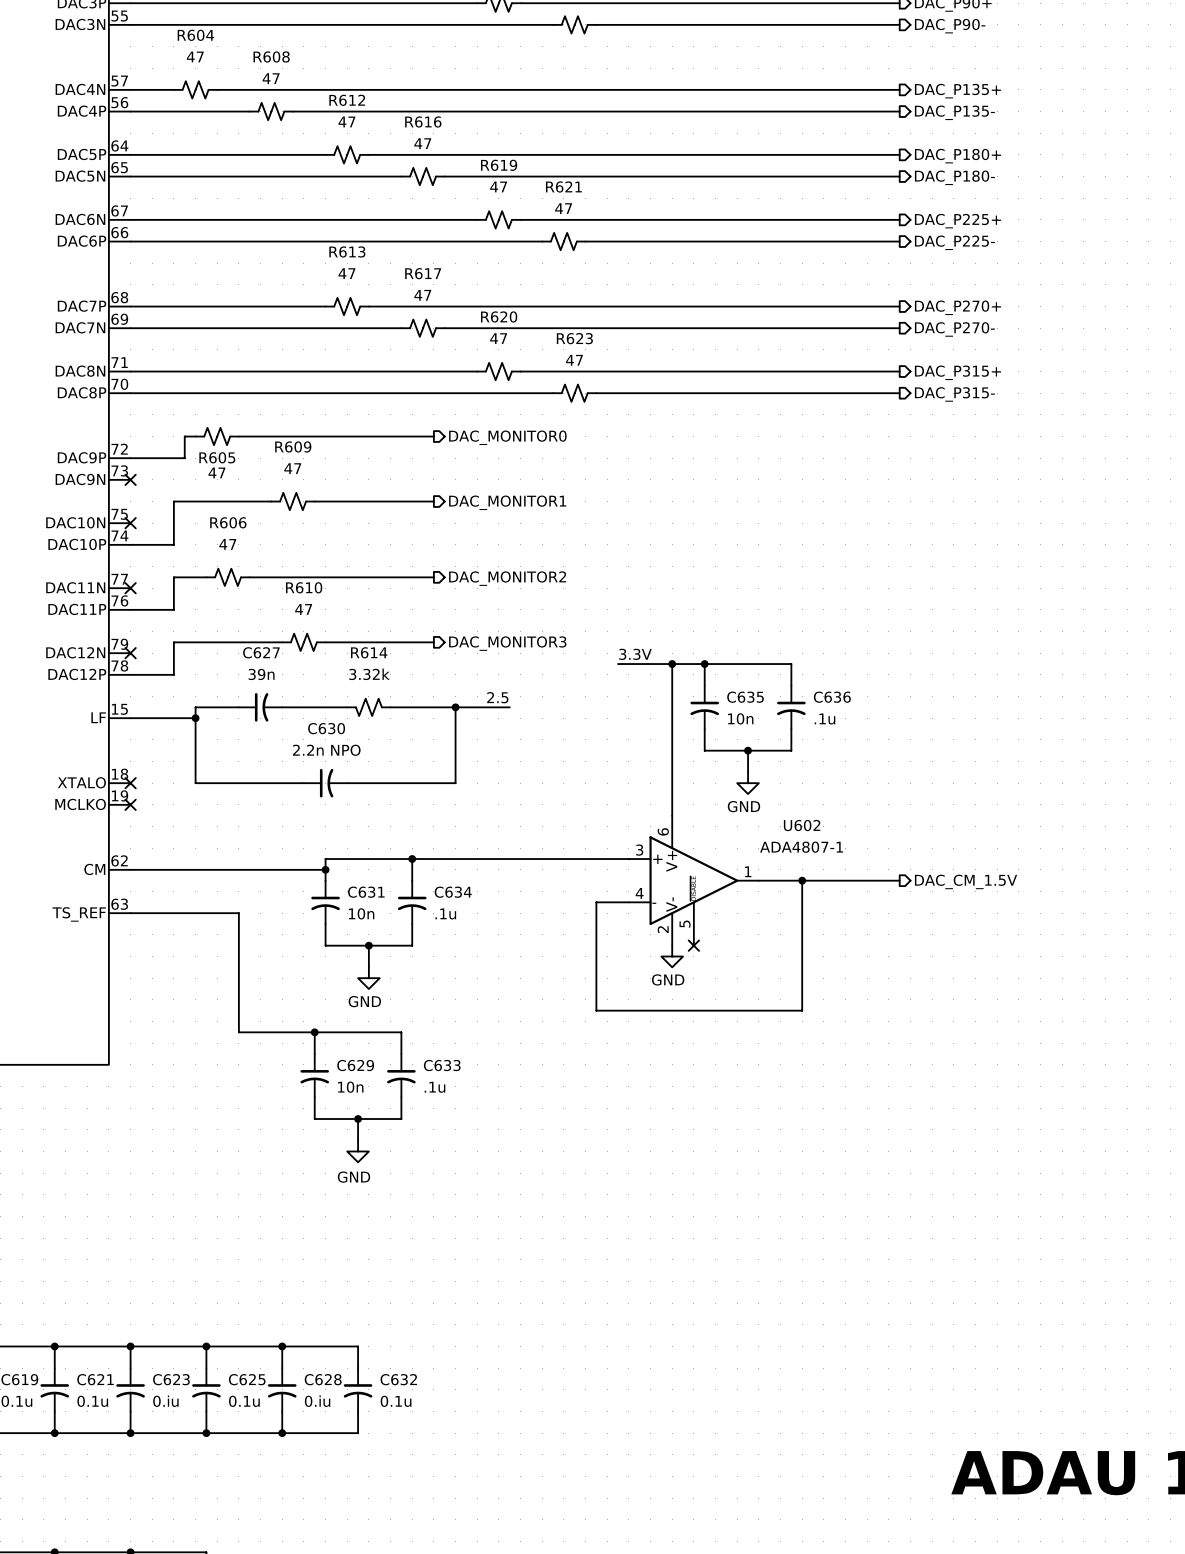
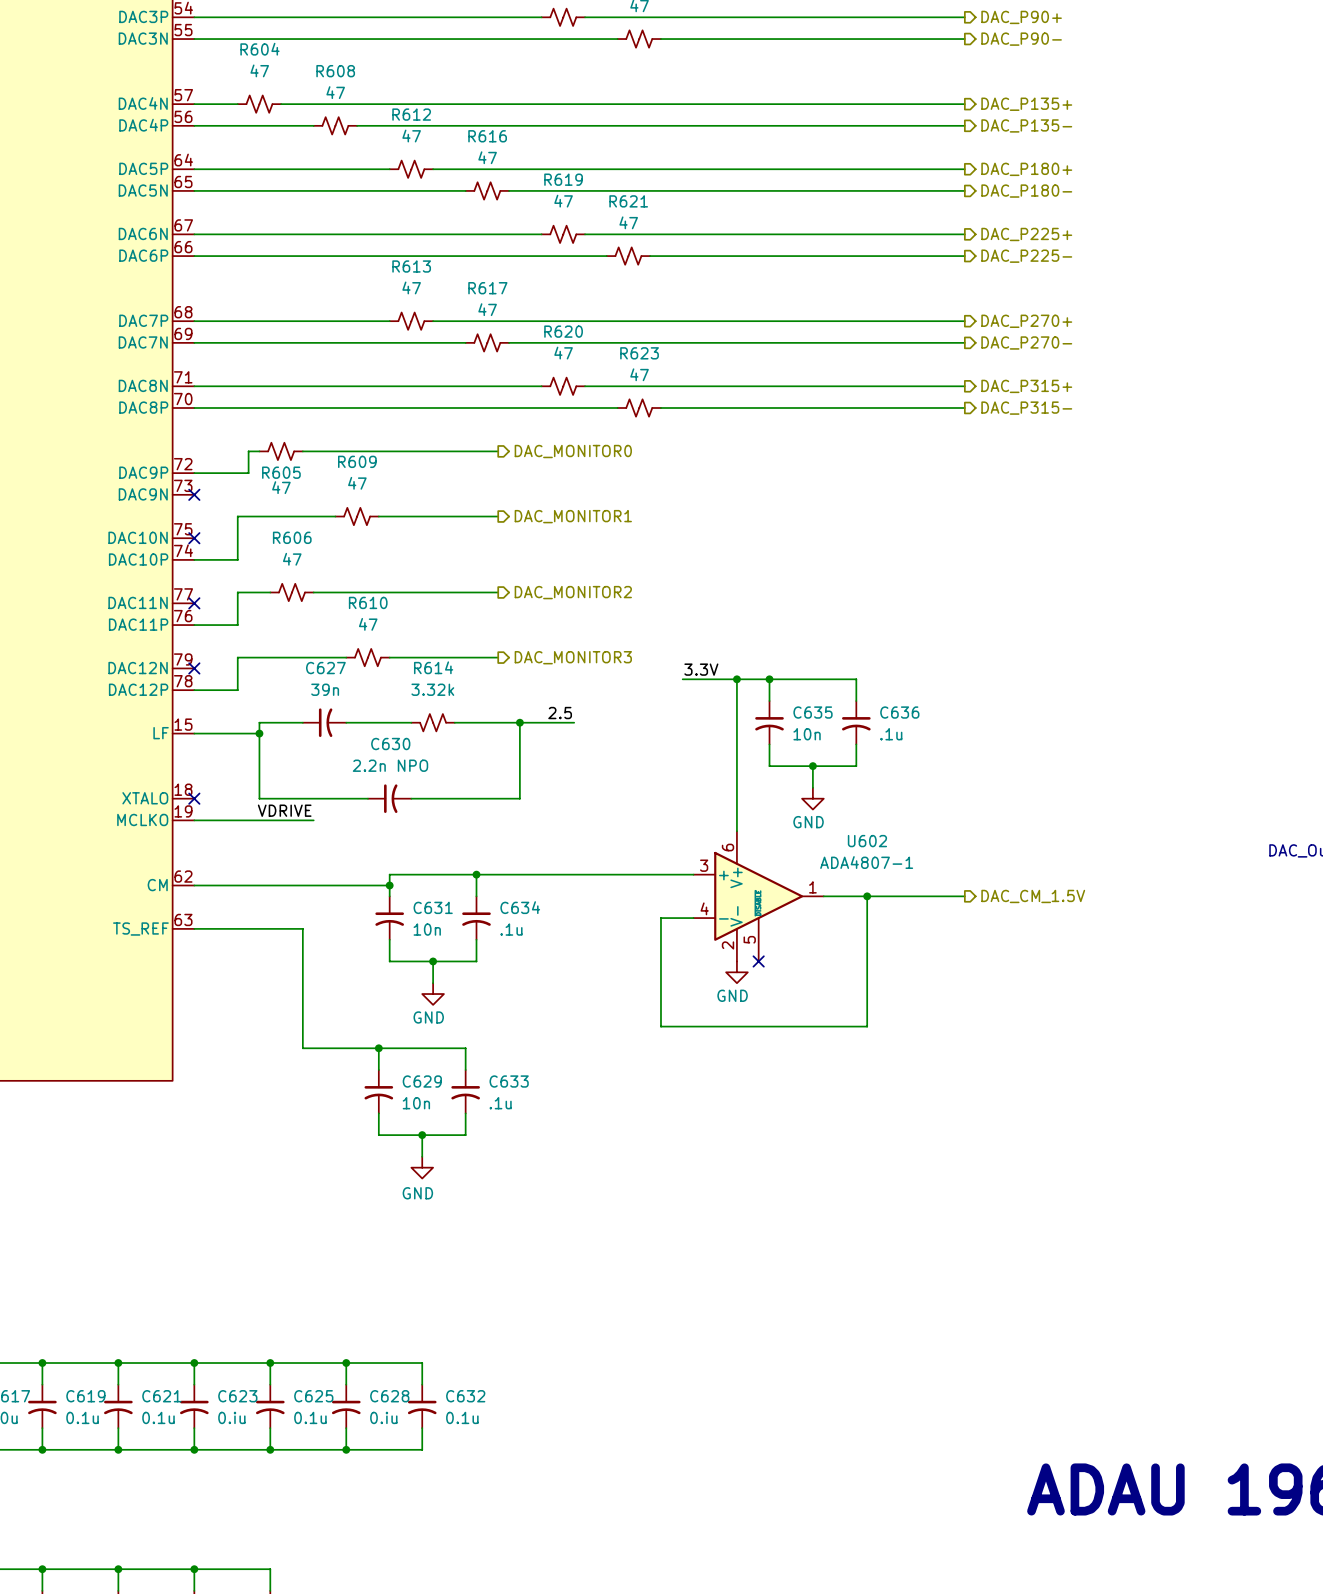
label: none -> VDRIVE (284, 810)
wire: none -> (194, 820) (313, 820)
no-connect mark: (130, 804) -> none

